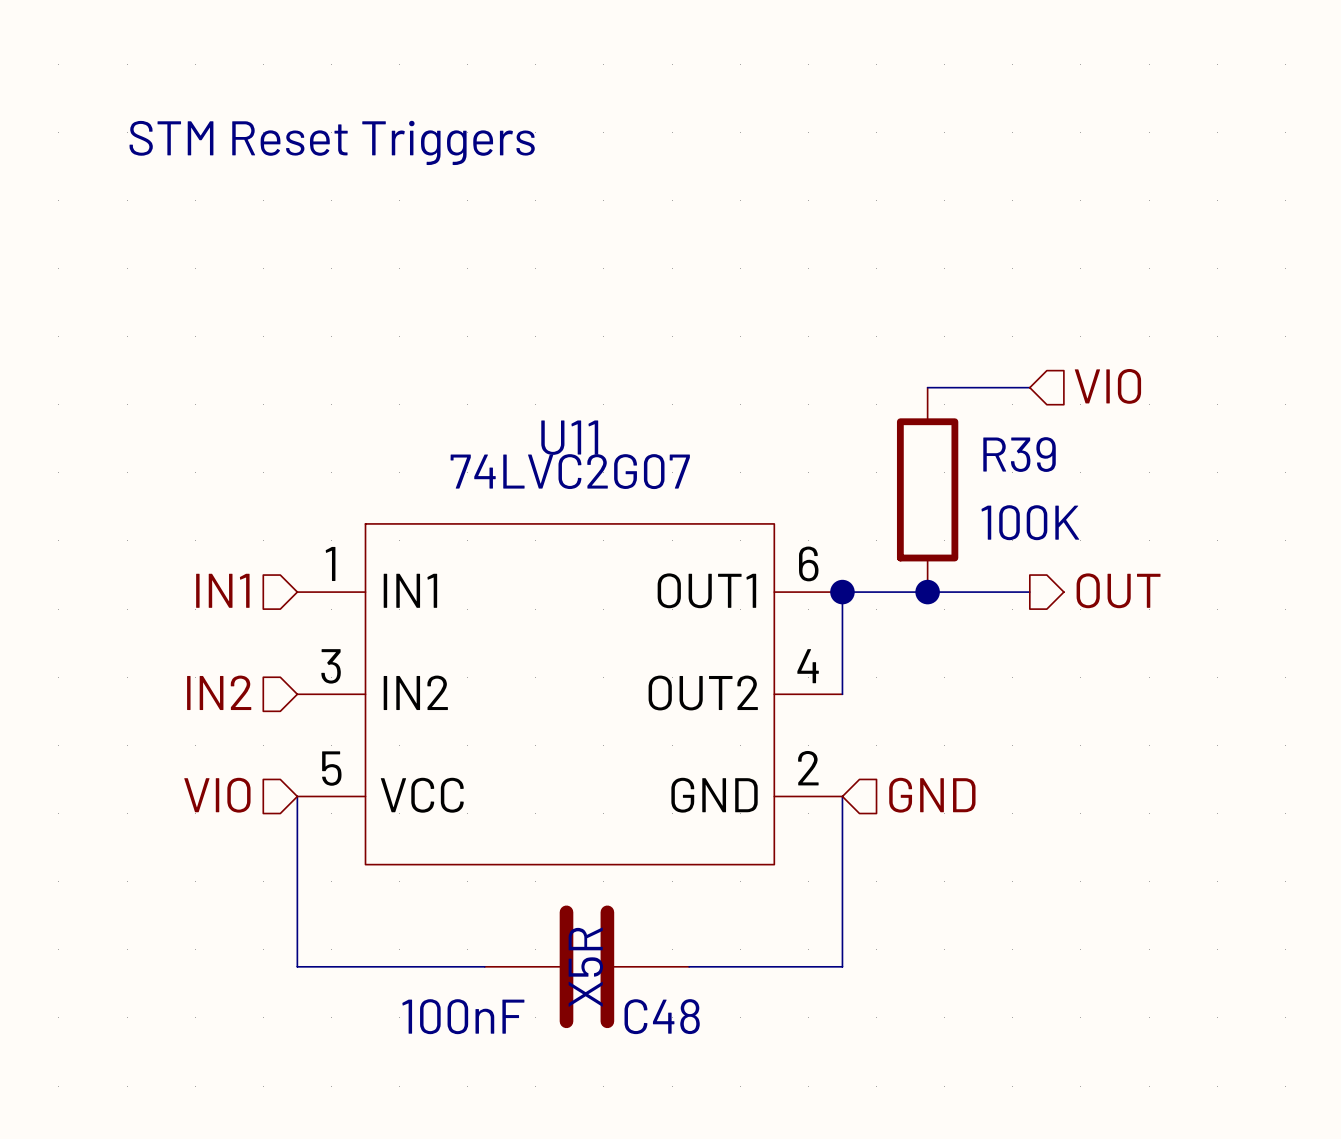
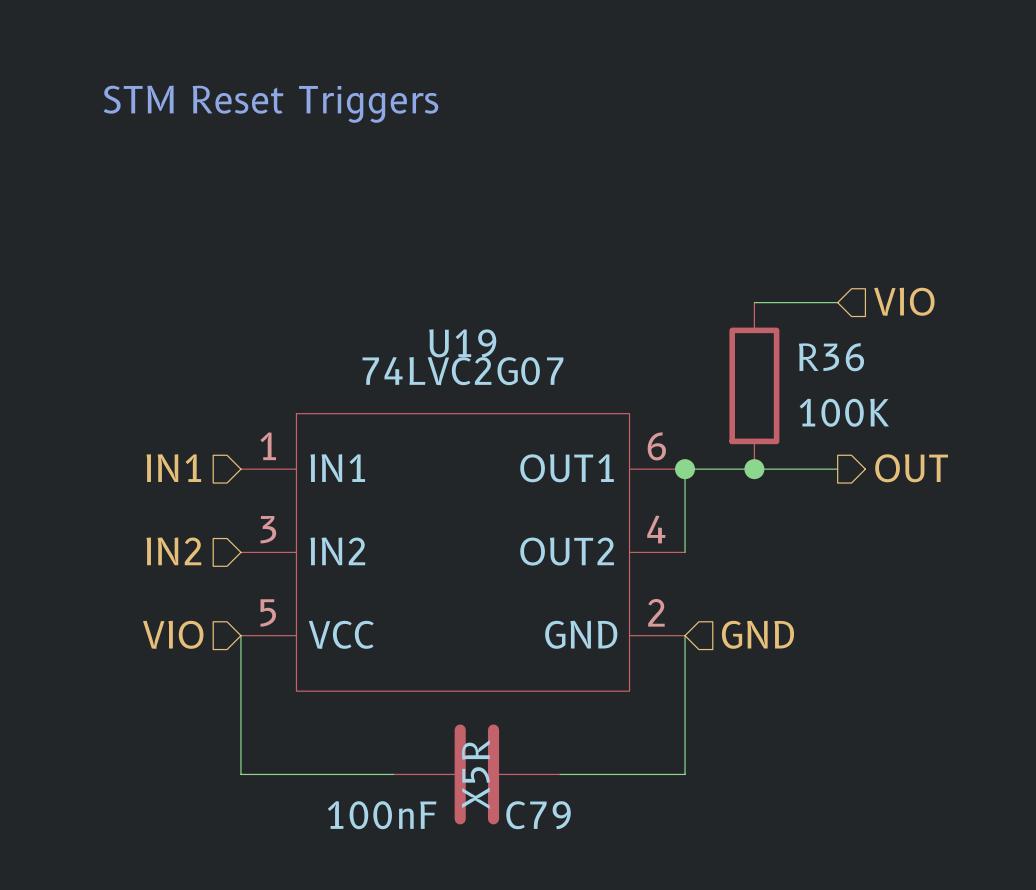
U11 name: U11 (569, 437) -> U19 (462, 343)
R39 name: R39 (1019, 454) -> R36 (831, 357)
C48 name: C48 (662, 1016) -> C79 (538, 815)

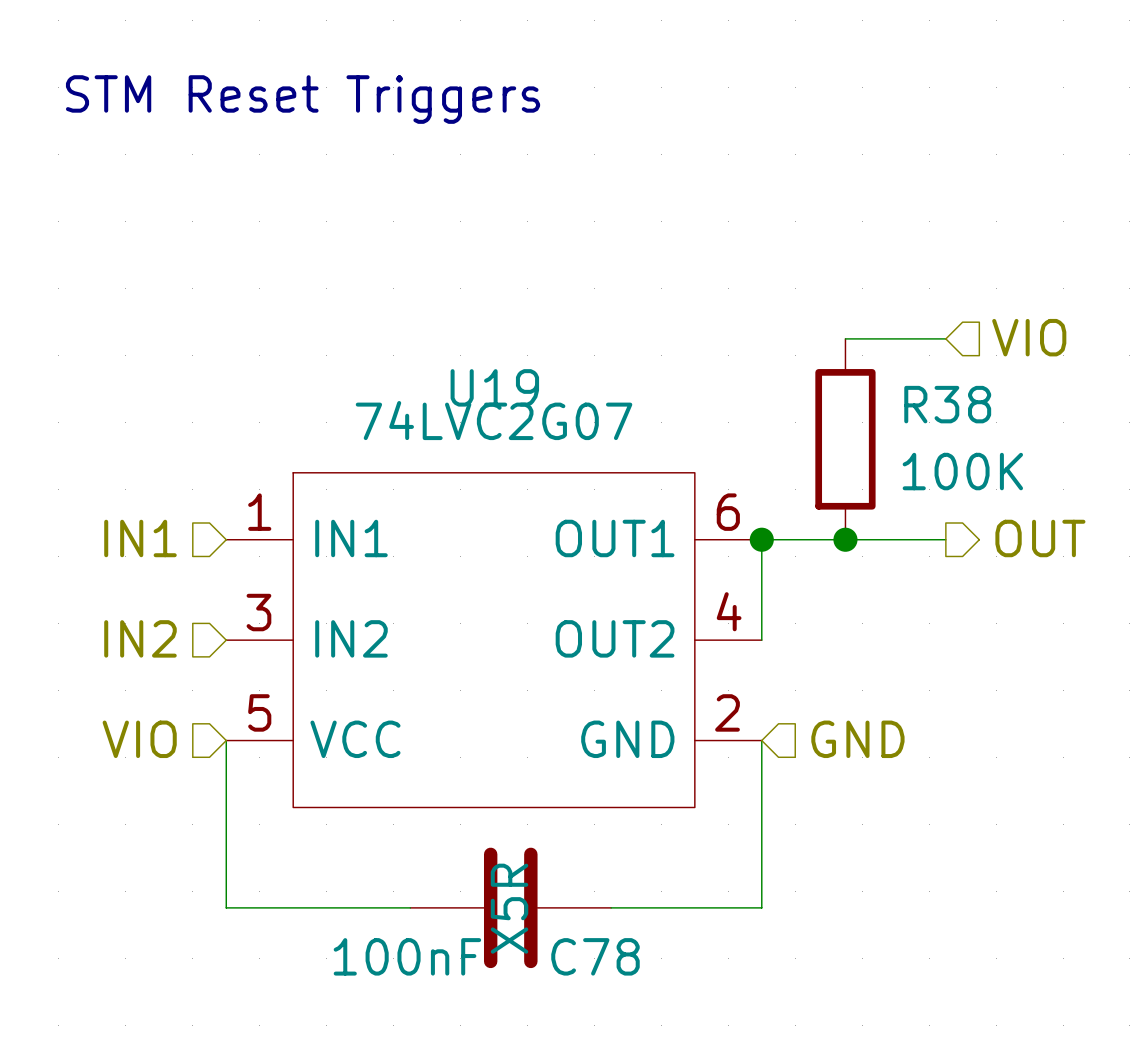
R36 name: R36 (831, 357) -> R38 (947, 404)
C79 name: C79 (538, 815) -> C78 (595, 956)

